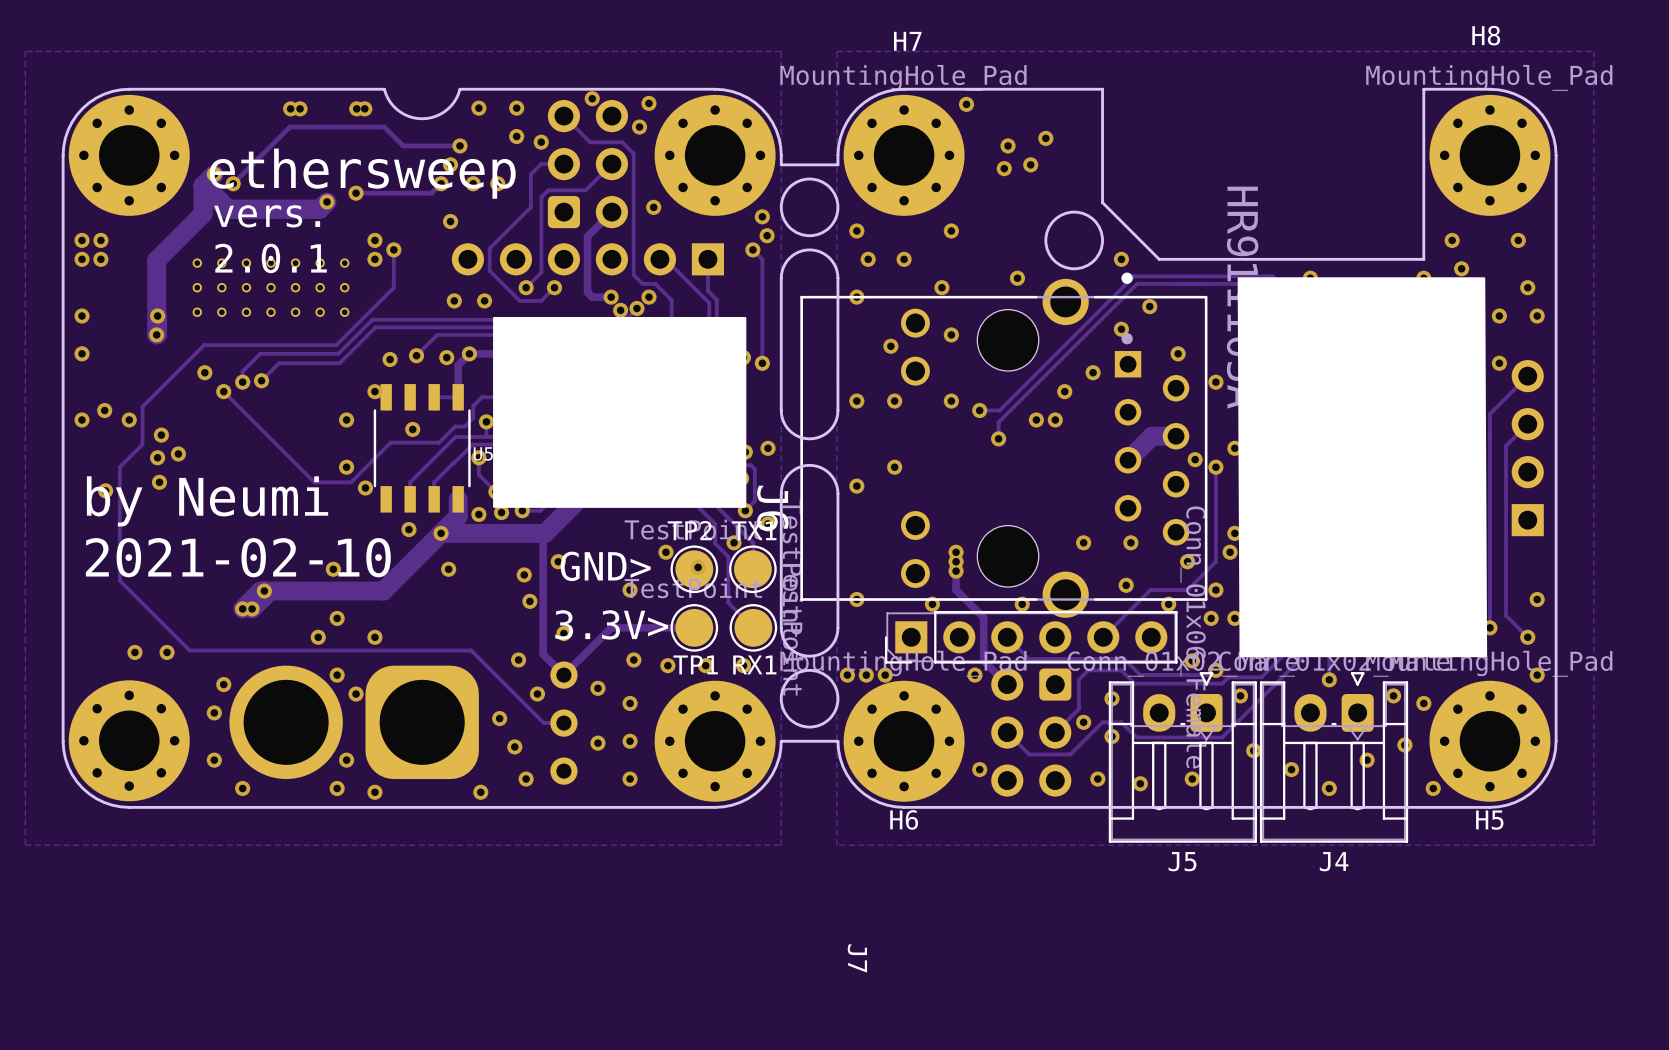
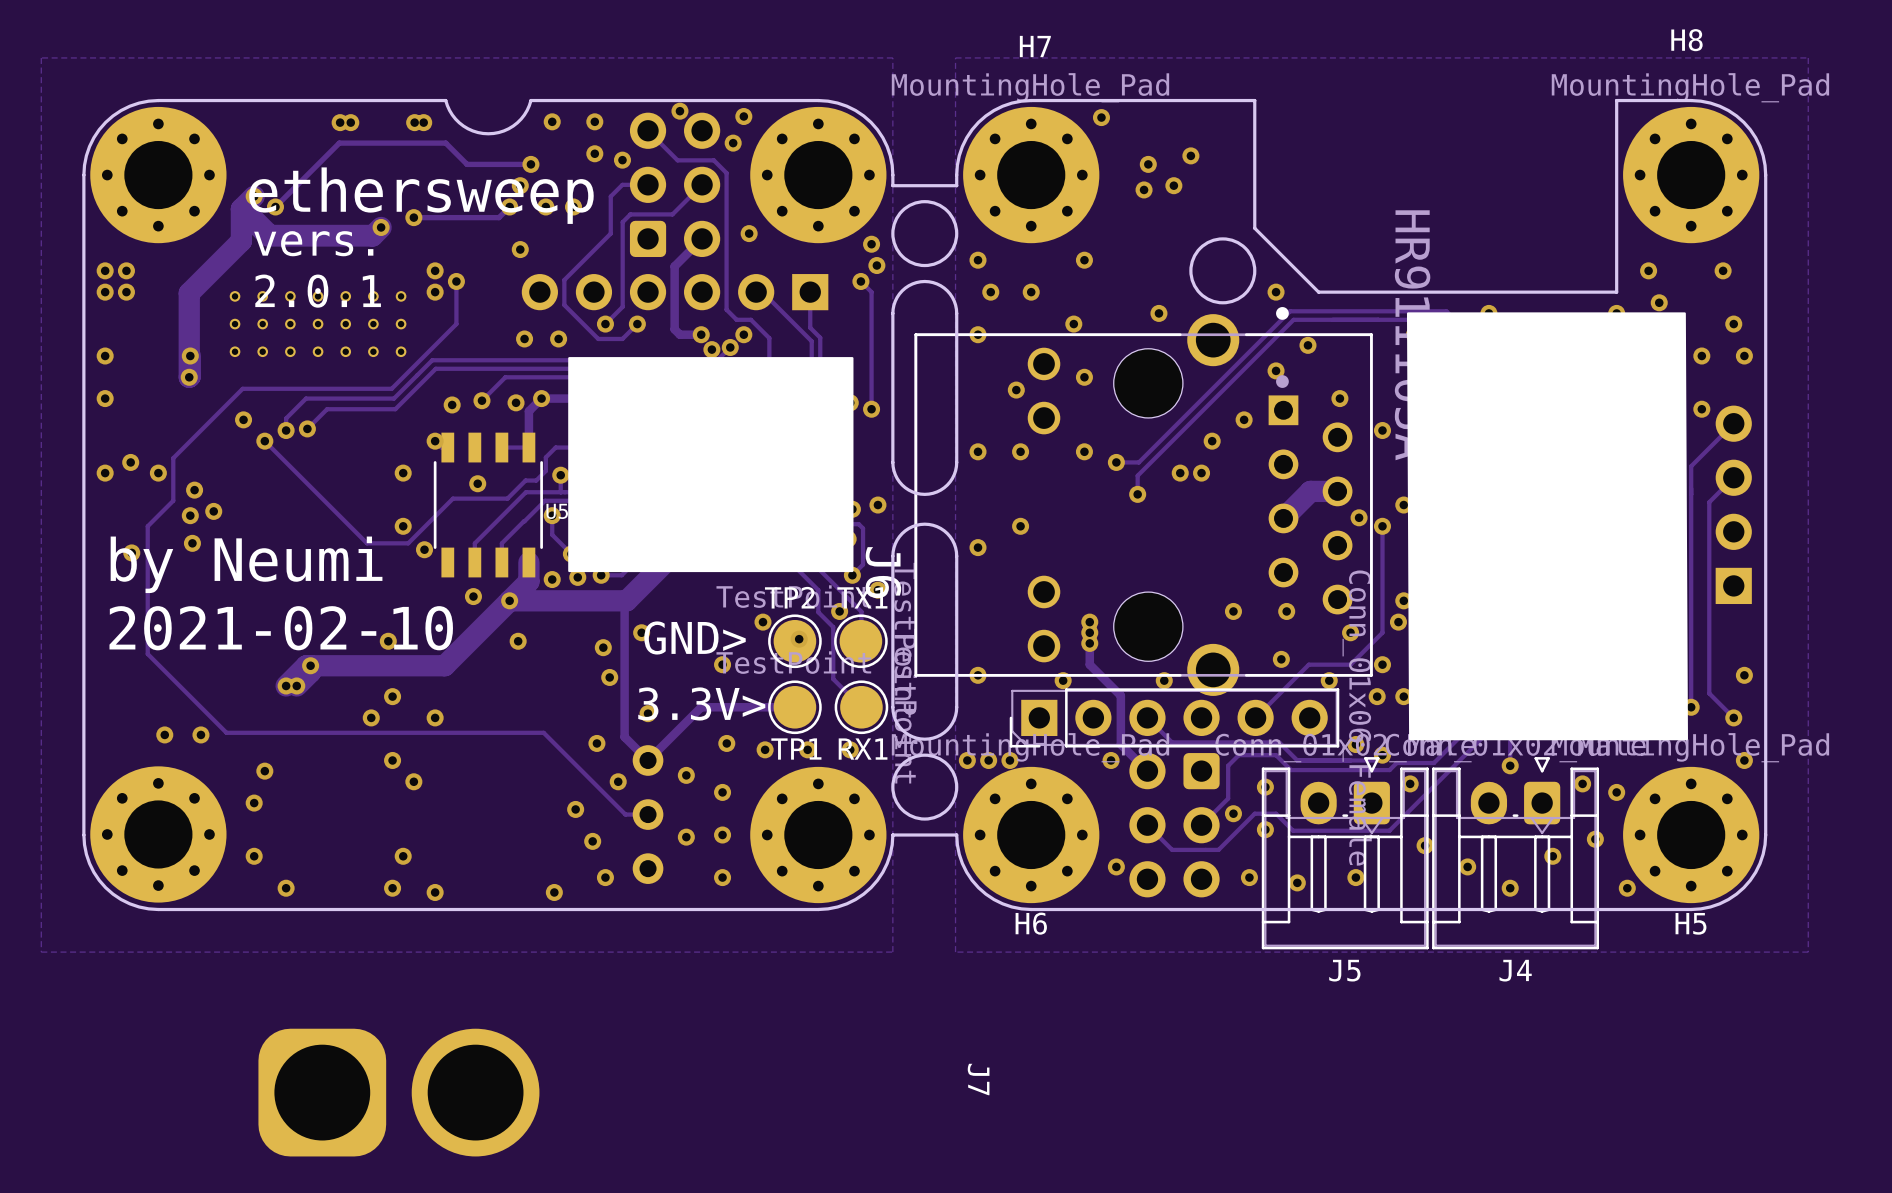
part rotation: 0° (354, 722) -> 180° (398, 1092)
part position: (354, 722) -> (398, 1092)

